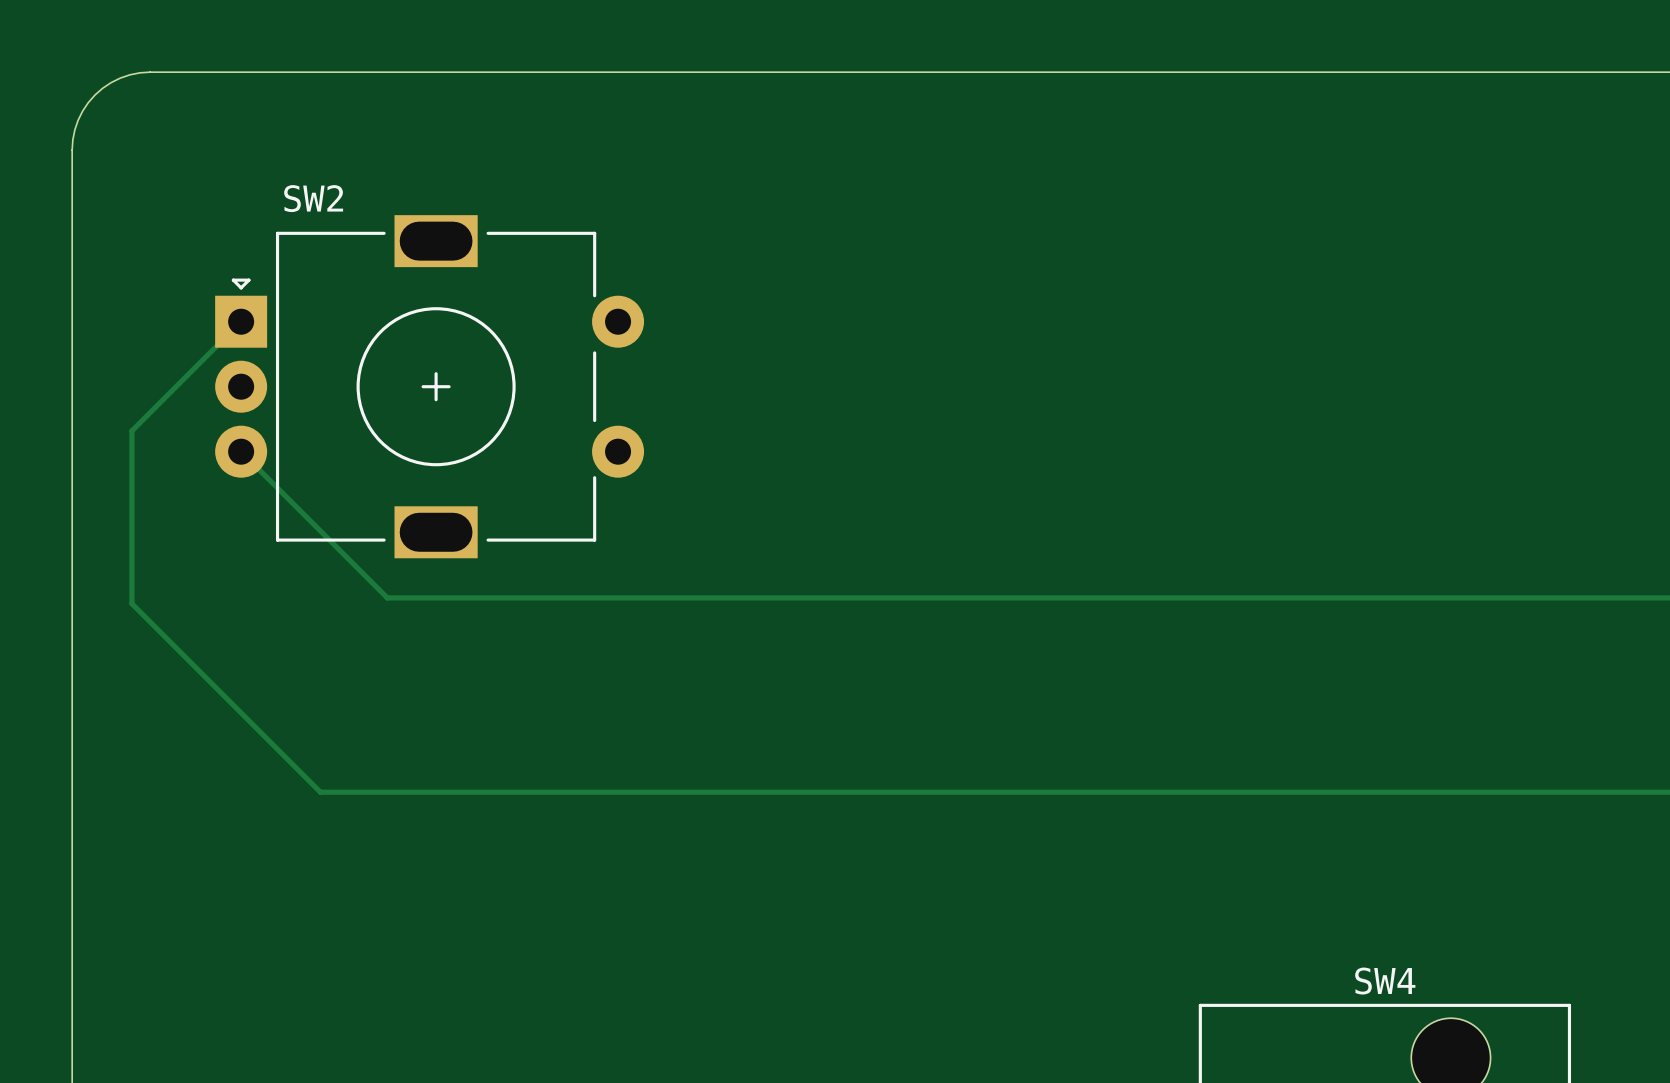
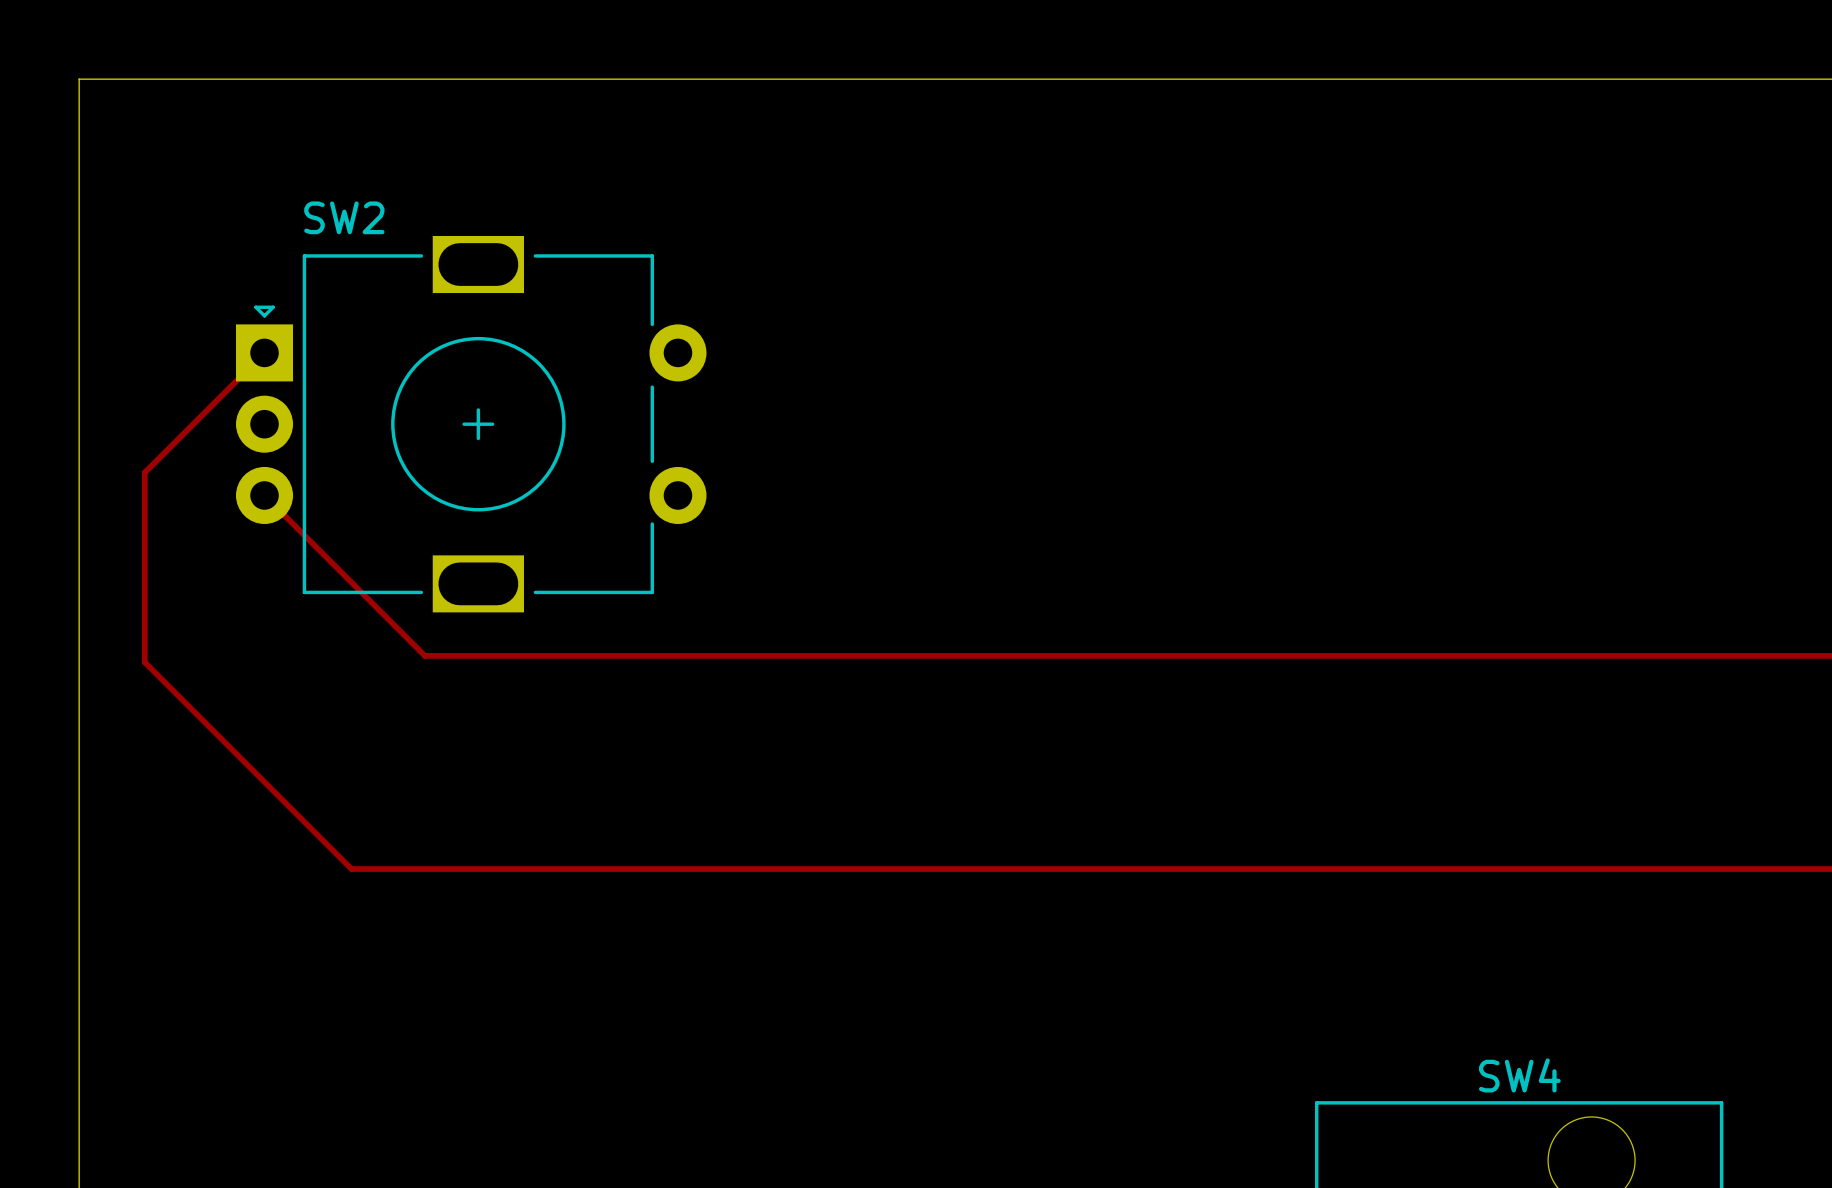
board edge: (150, 72) (120, 78) (95, 95) (78, 120) (72, 150) -> (164, 79) (79, 79) (79, 164)

